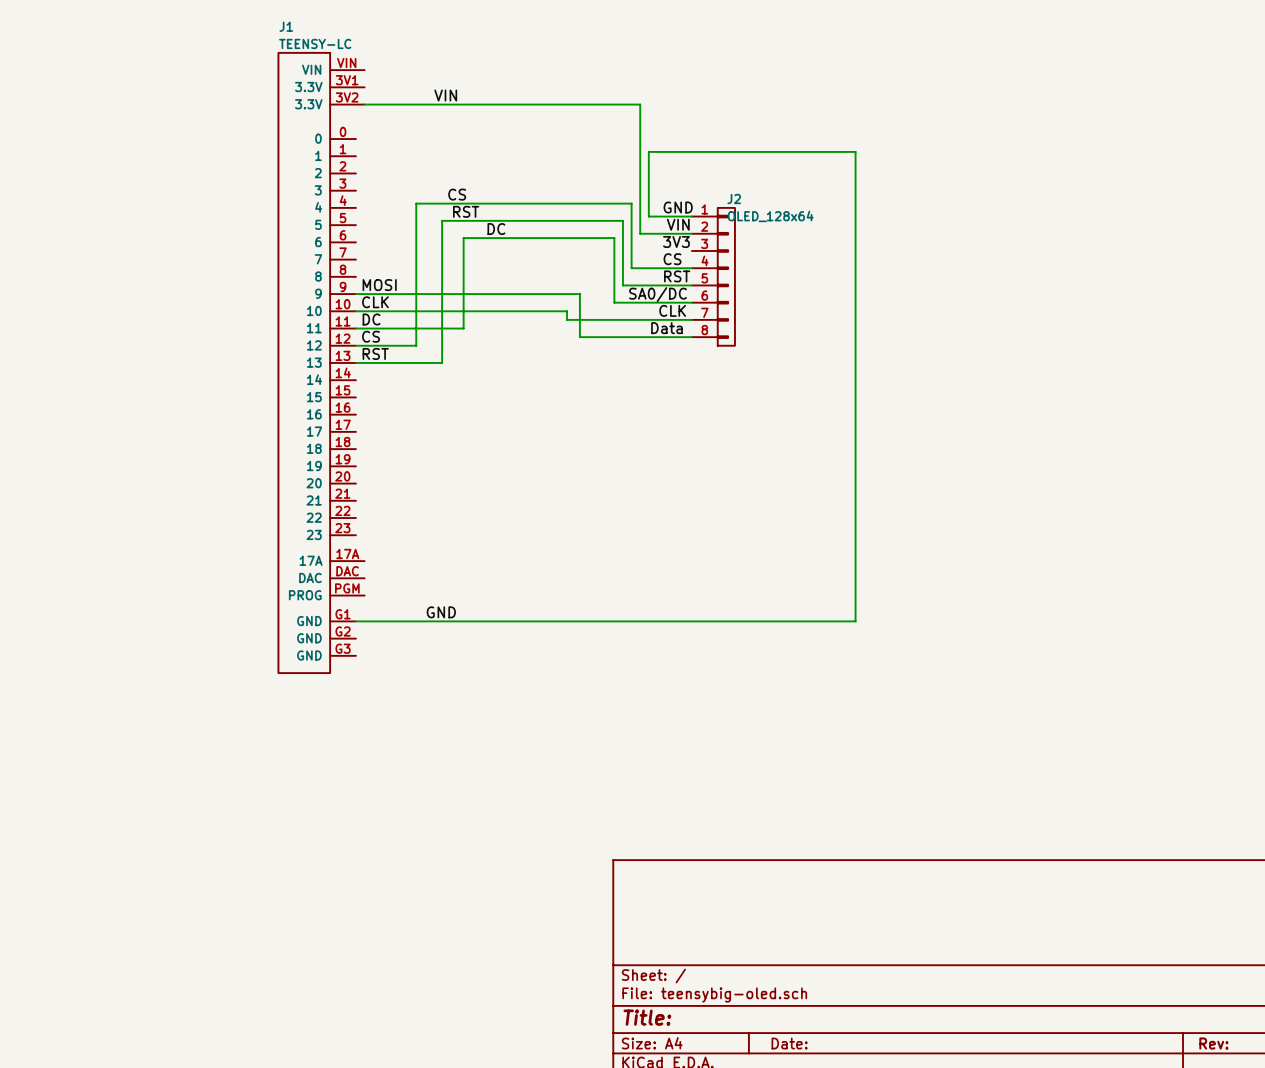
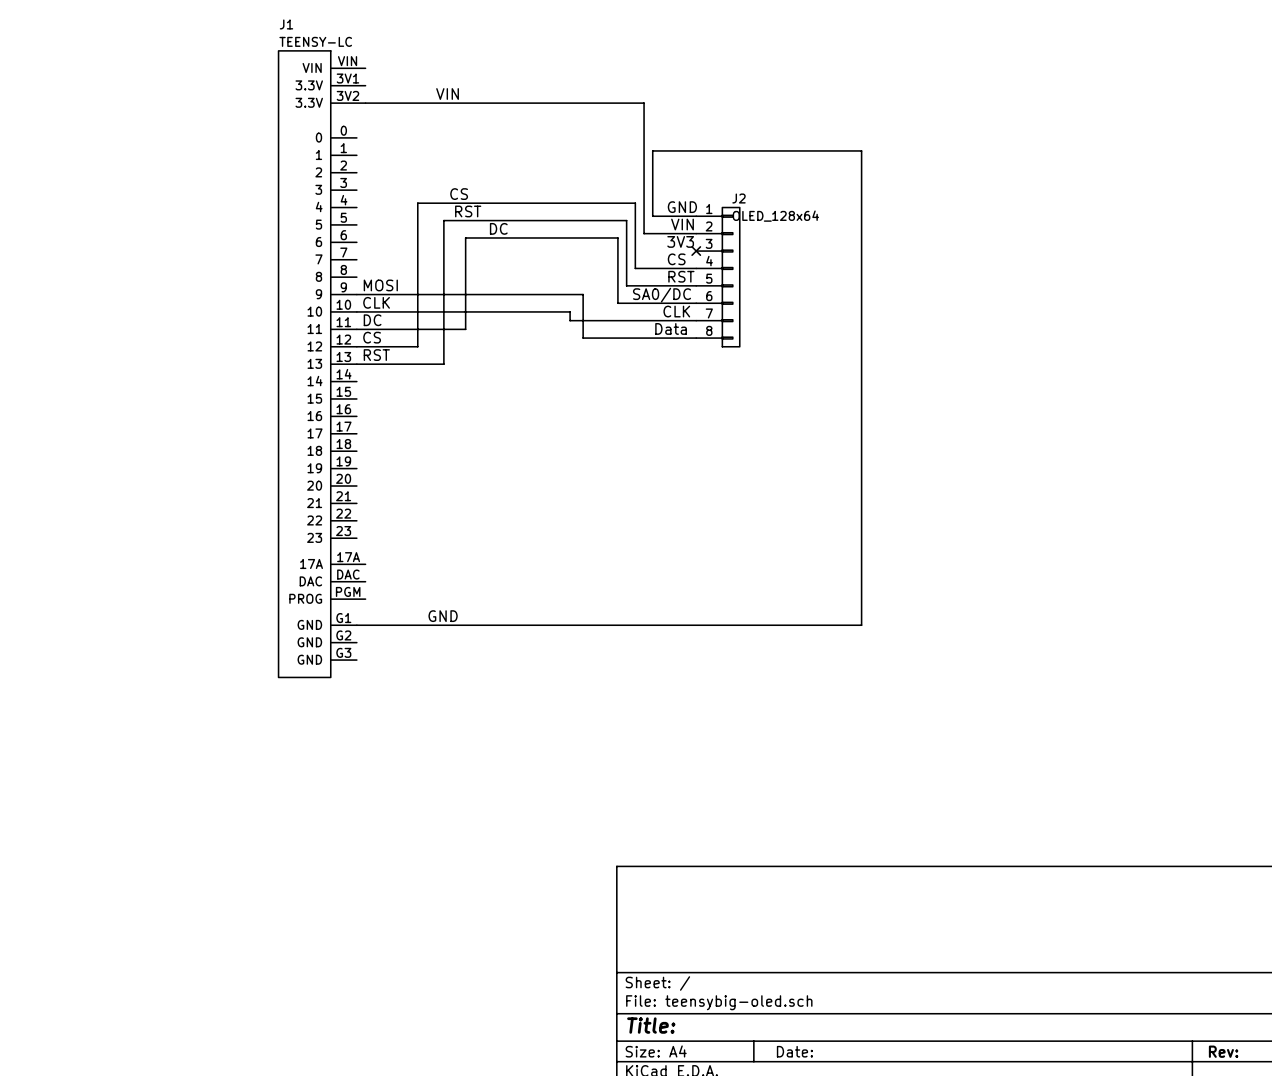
no-connect mark: none -> (696, 251)

